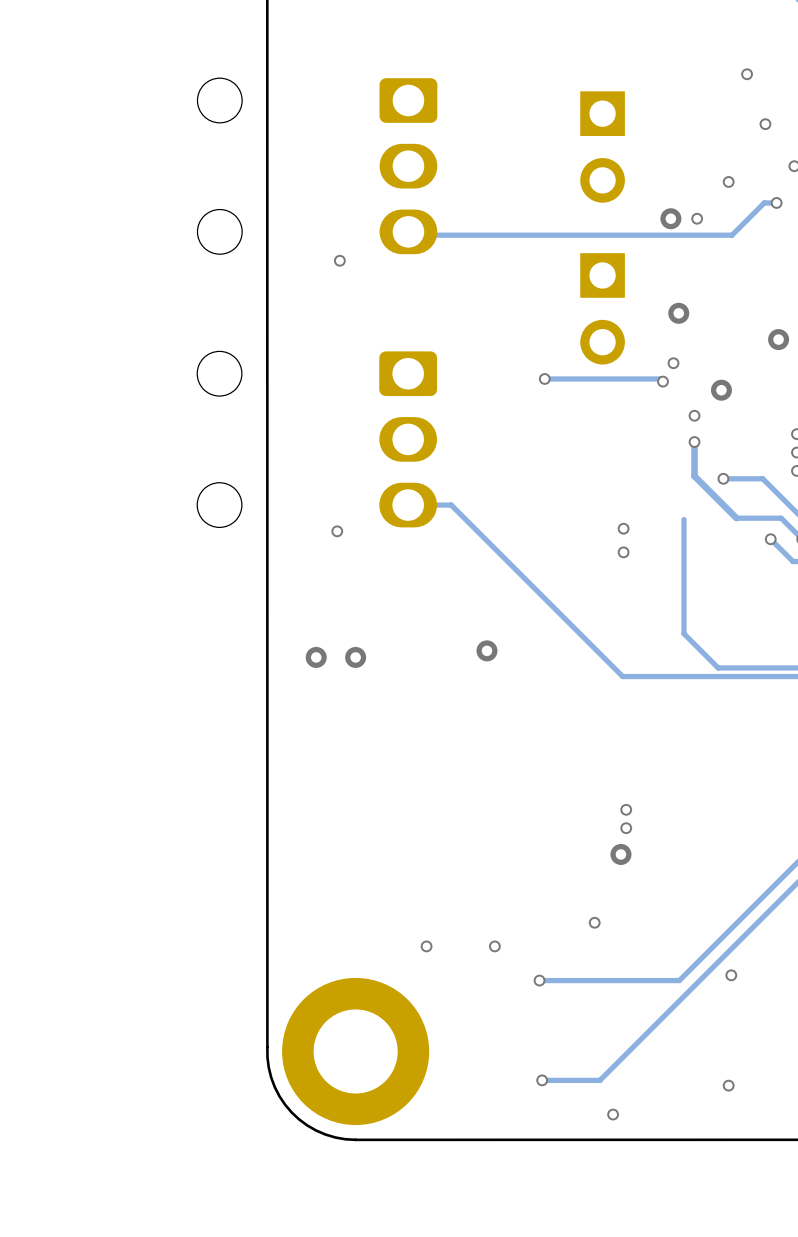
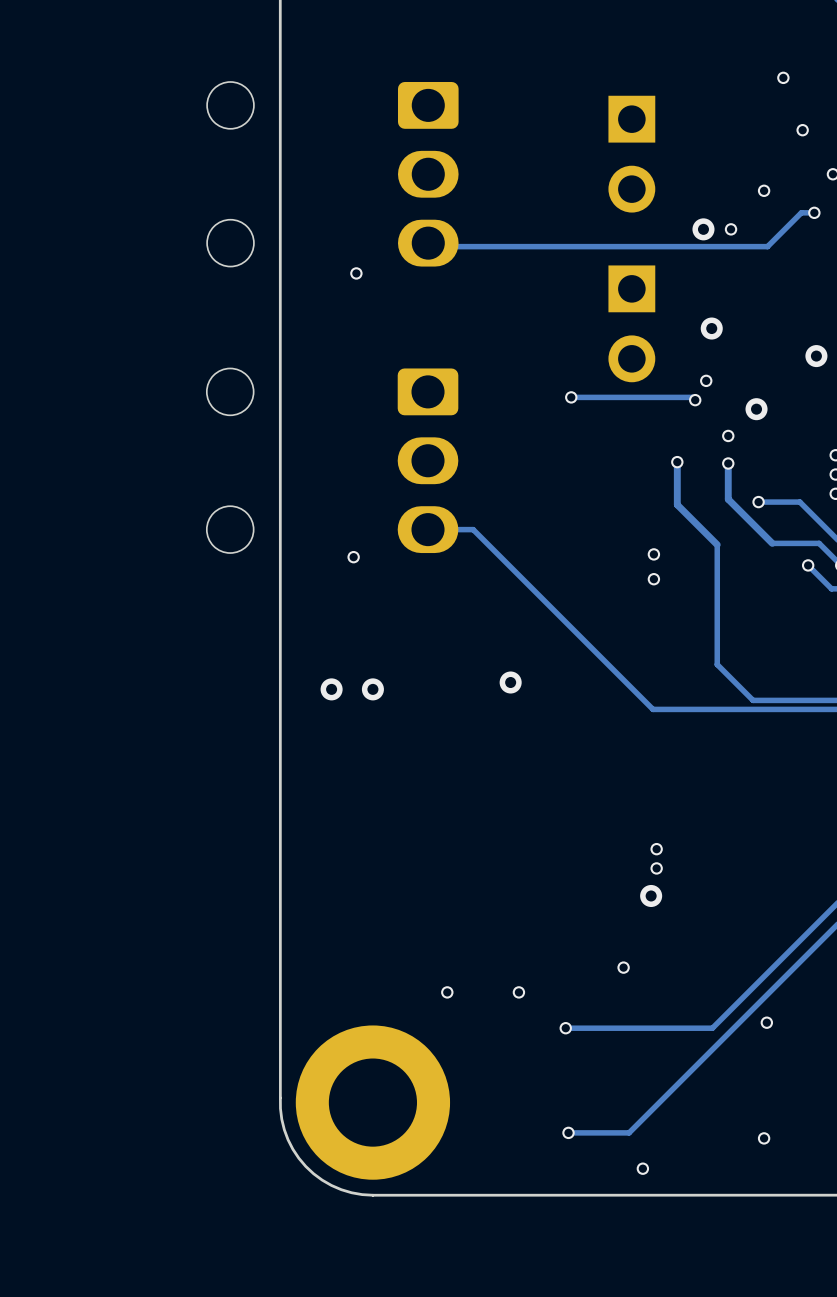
track: none -> (677, 462) (677, 504) (717, 544)
via: none -> (677, 462)

